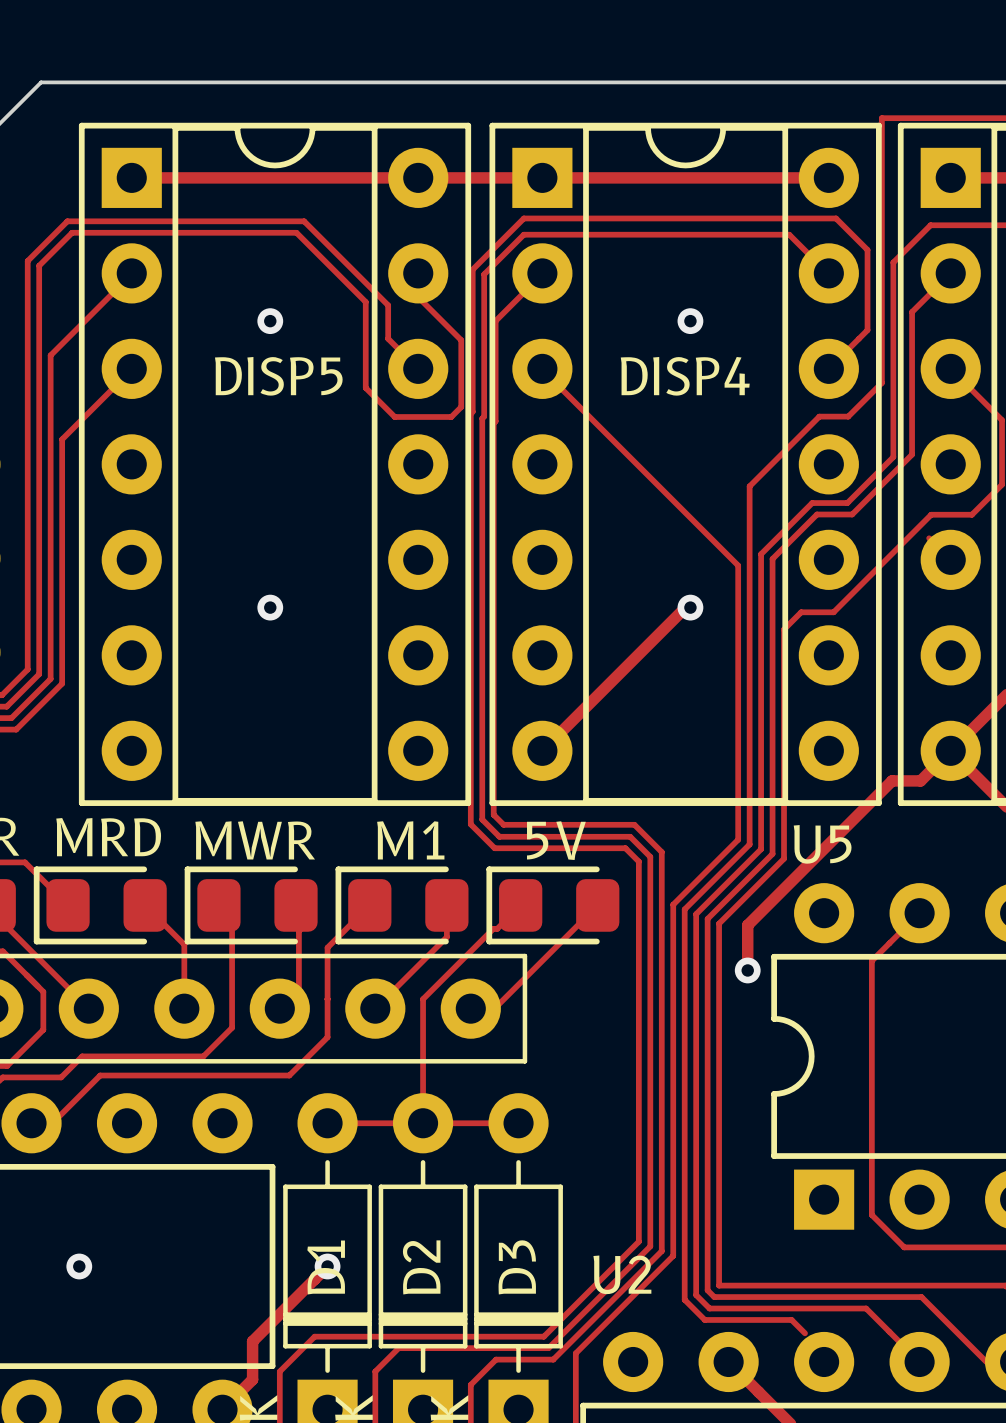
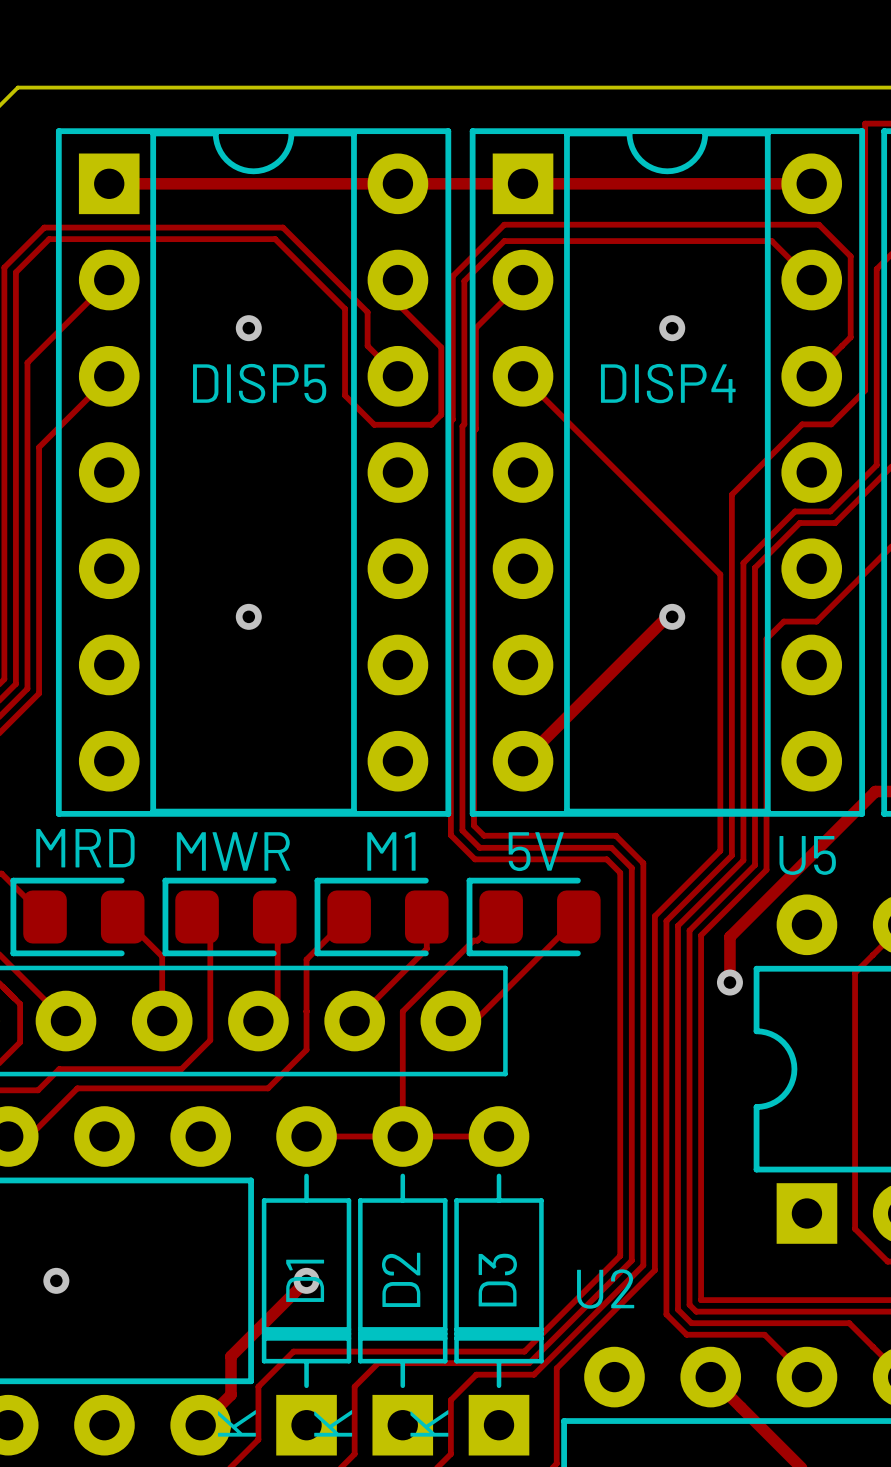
track: (782, 1319) (791, 1319) (805, 1333) -> (764, 1334) (806, 1377)

